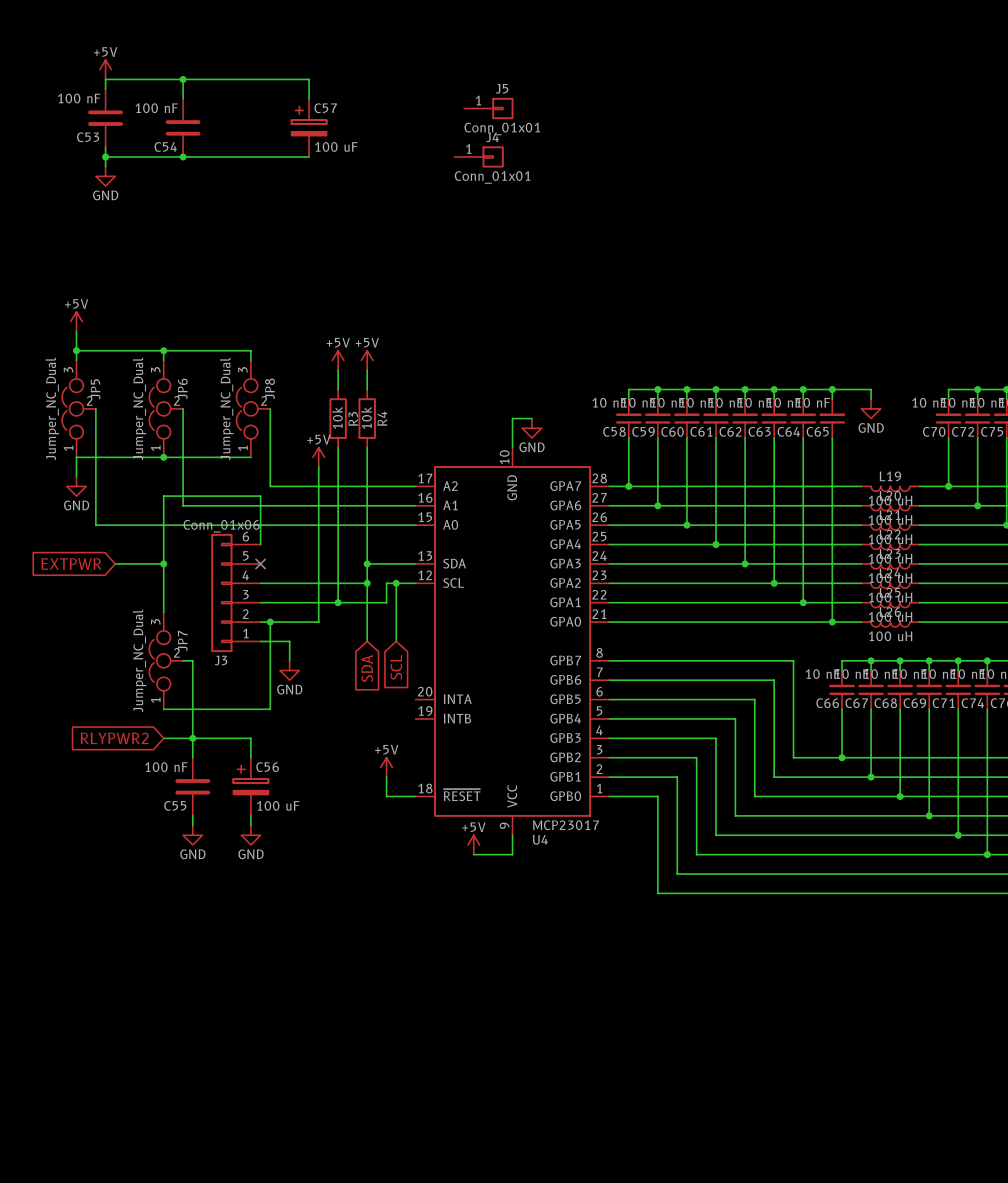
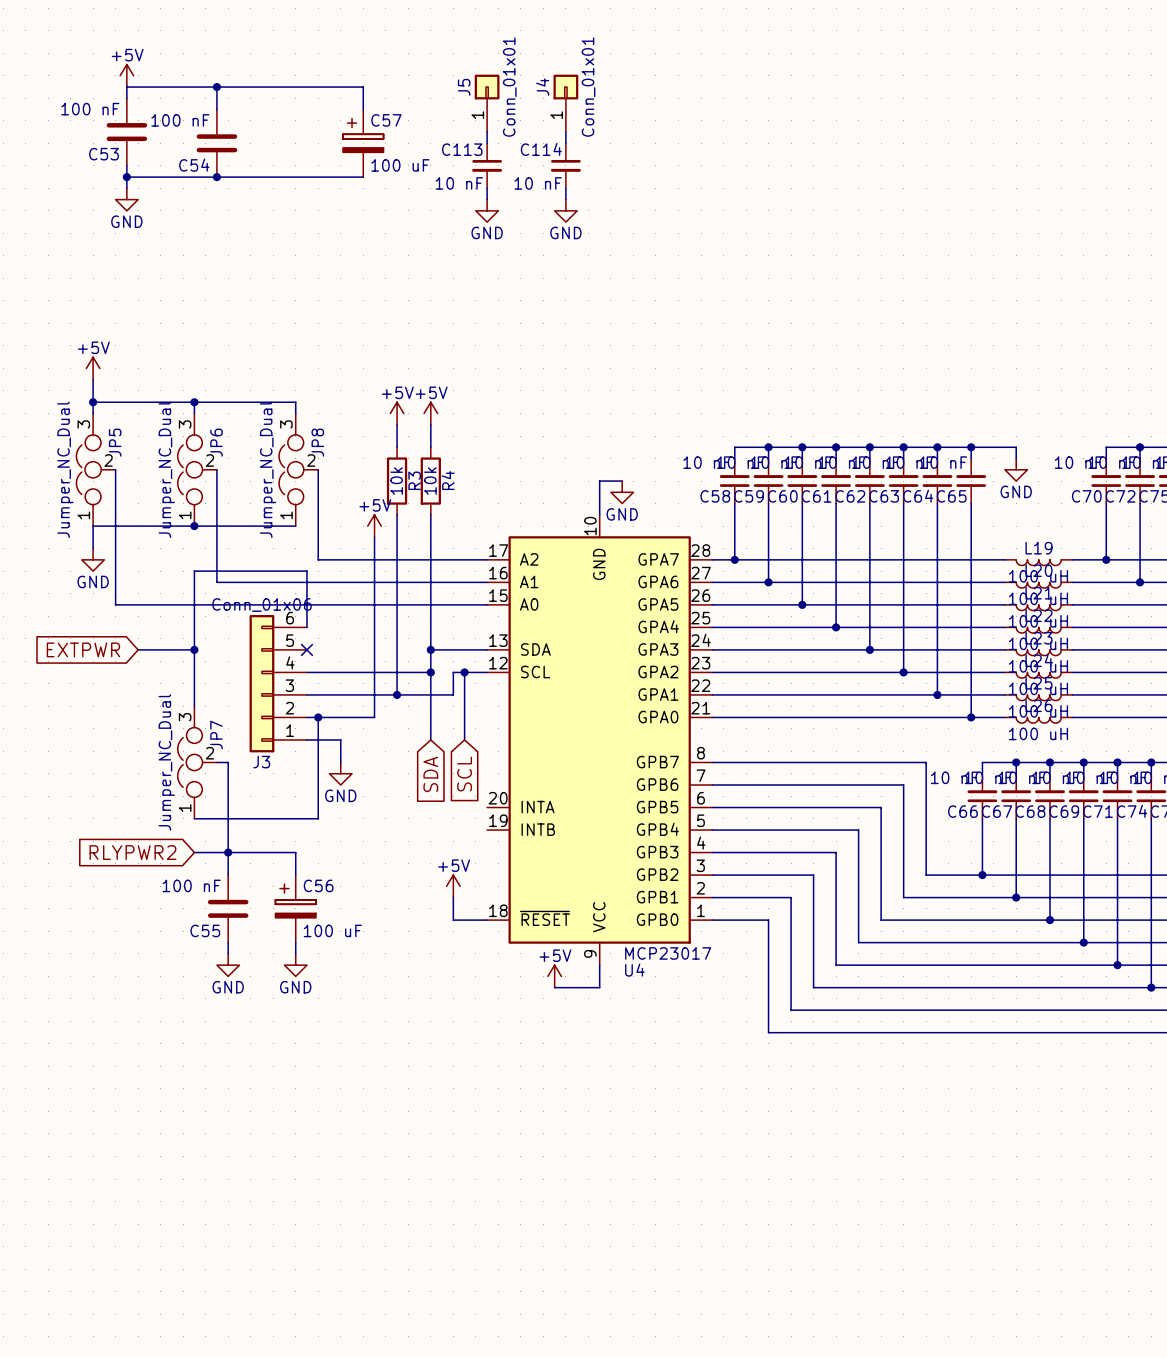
J5 position: (488, 108) -> (487, 103)
J5 rotation: 0° (502, 108) -> 90° counterclockwise (487, 87)
wire: none -> (487, 132) (487, 143)
wire: none -> (565, 132) (565, 143)
C113: none -> 10 nF (487, 165)
C114: none -> 10 nF (565, 165)
J4 position: (479, 156) -> (565, 103)
J4 rotation: 0° (493, 156) -> 90° counterclockwise (565, 87)
wire: none -> (487, 188) (487, 199)
wire: none -> (565, 188) (565, 199)
power symbol: none -> GND (487, 210)
power symbol: none -> GND (565, 210)

